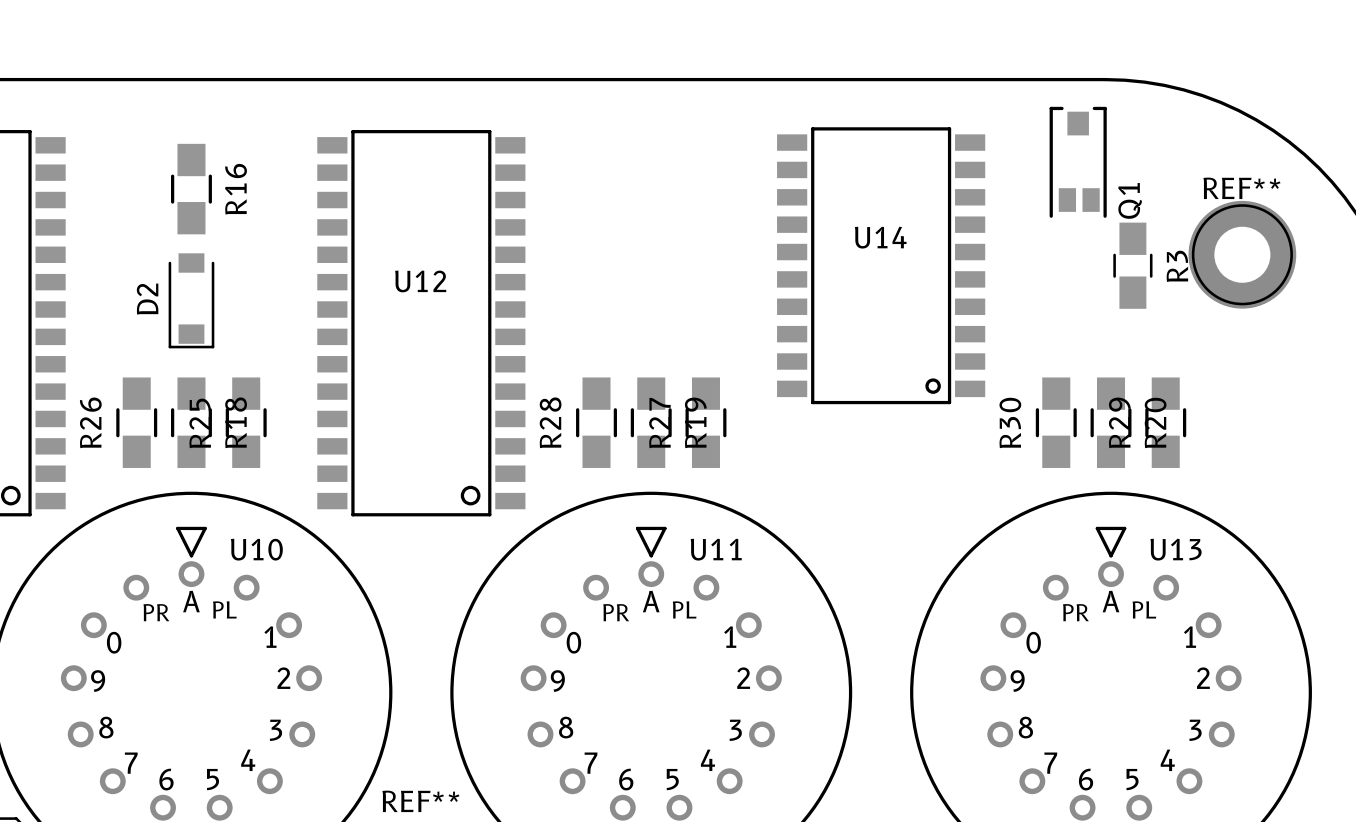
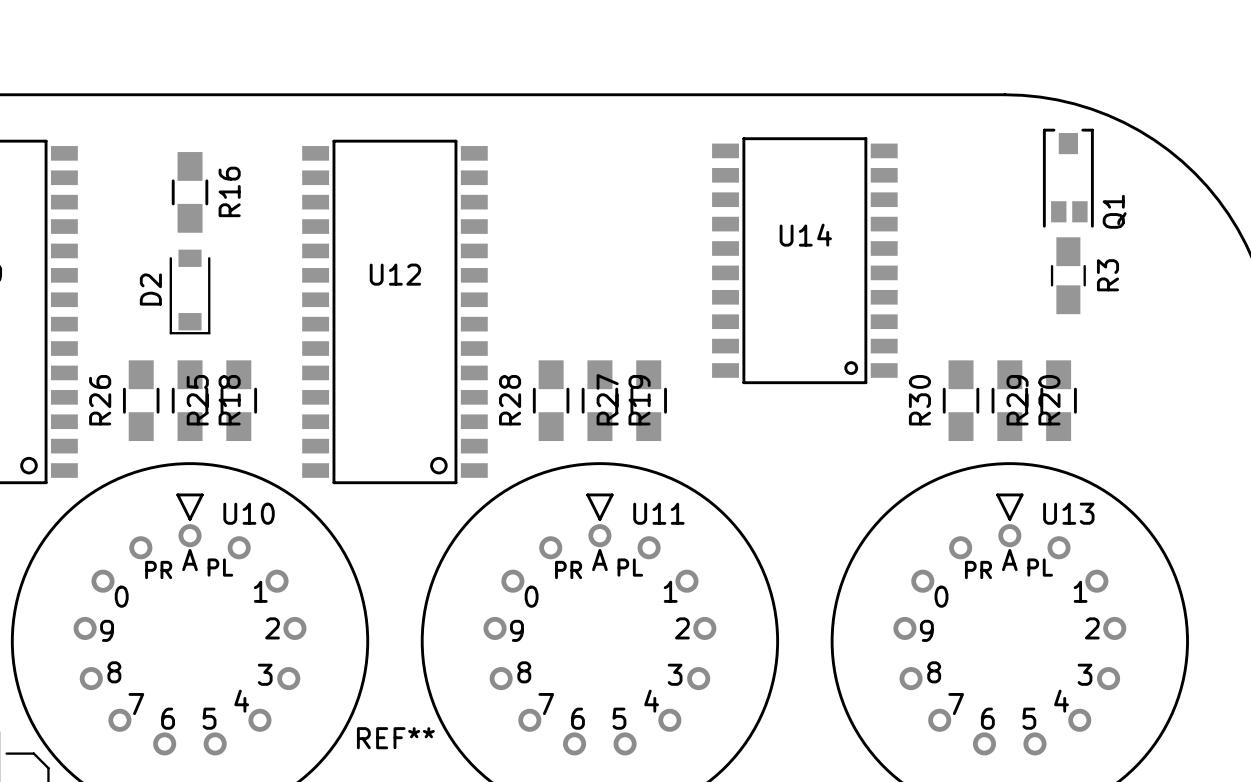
Q1 position: (1078, 162) -> (1068, 178)
REF**: (1242, 254) -> none
R3 position: (1132, 265) -> (1068, 275)

